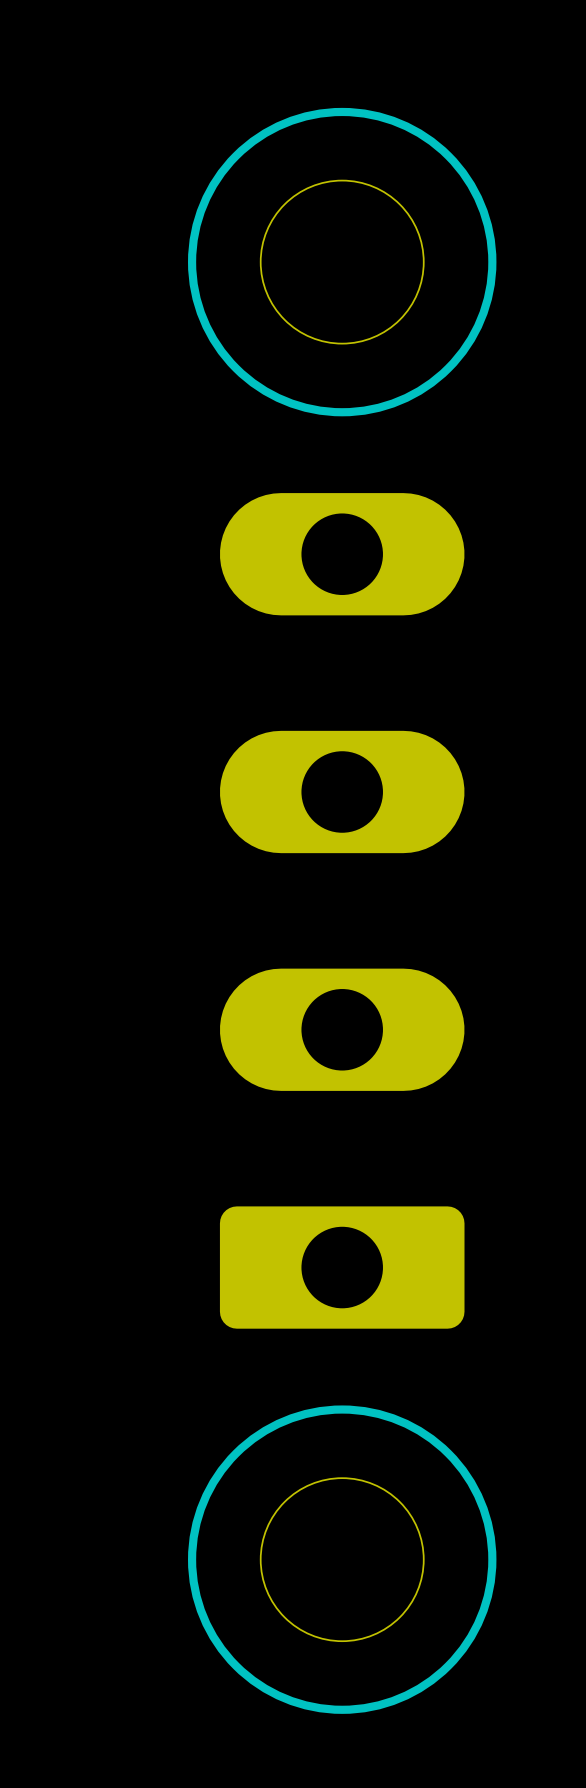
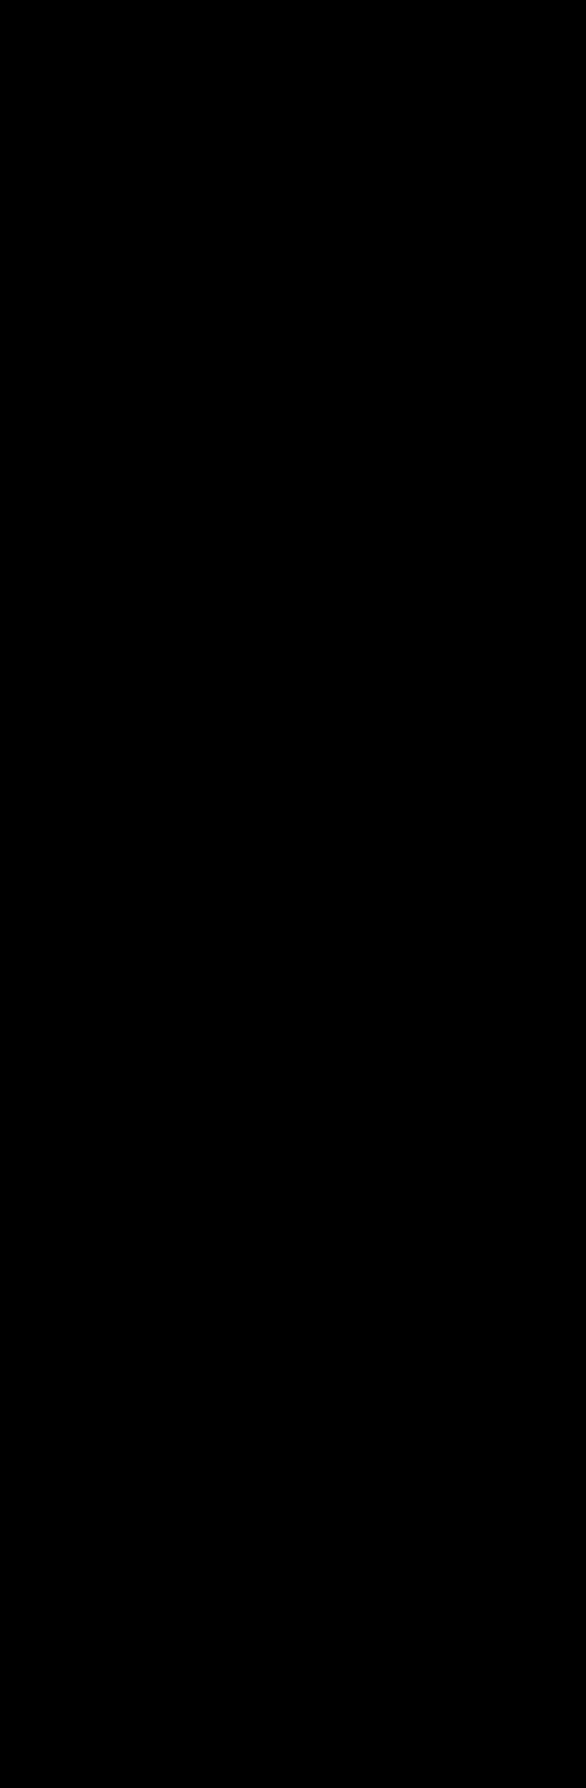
part: (342, 910) -> none

